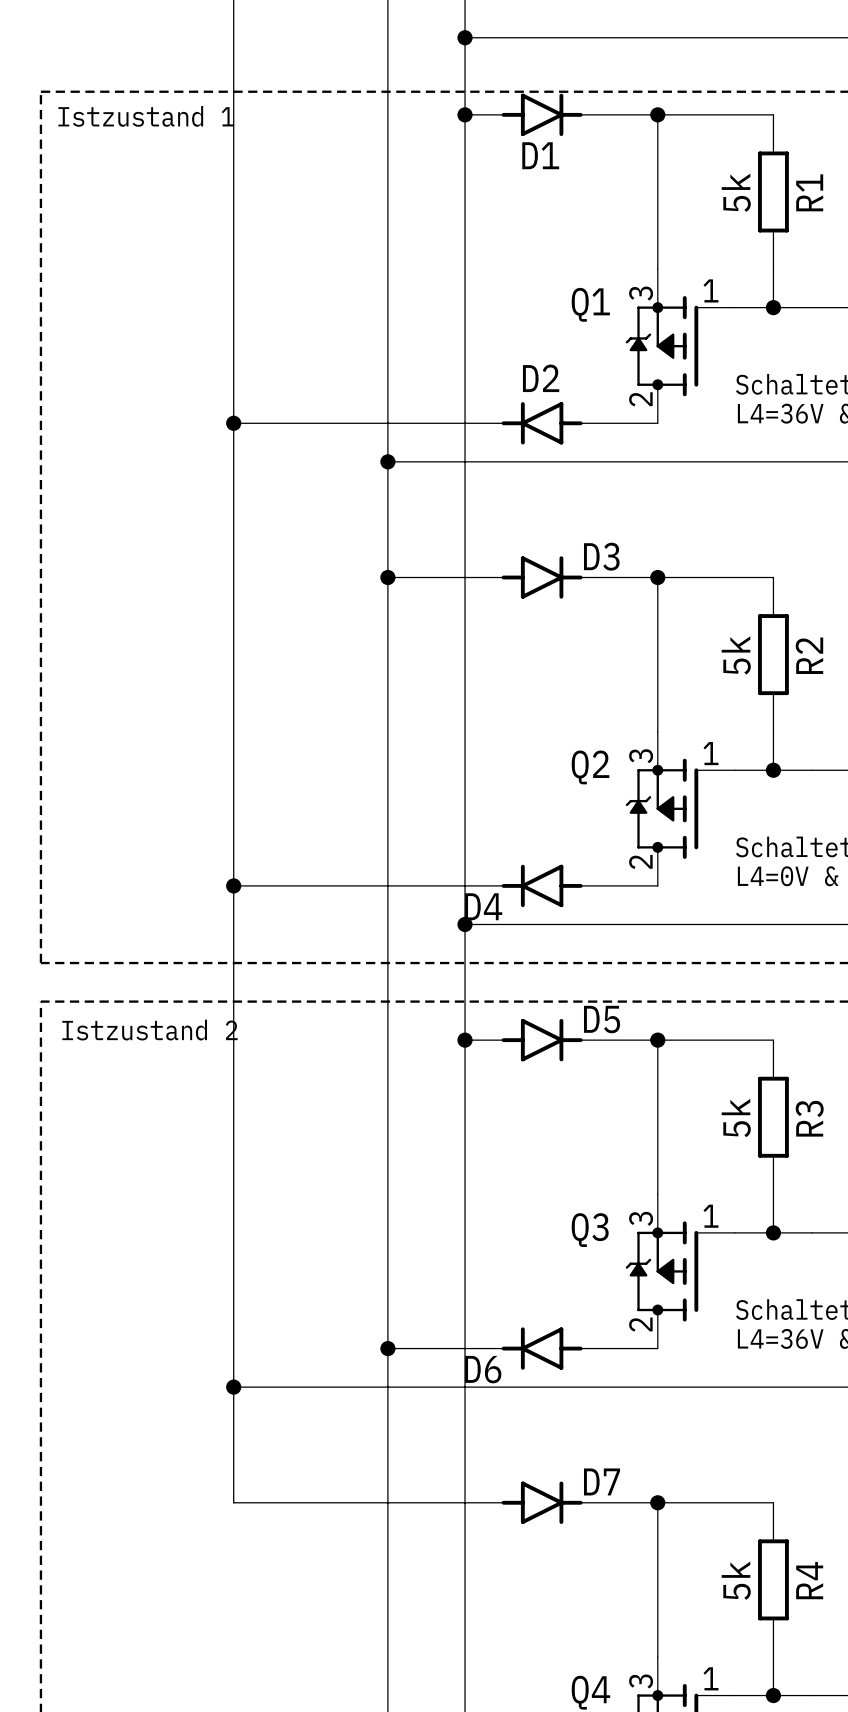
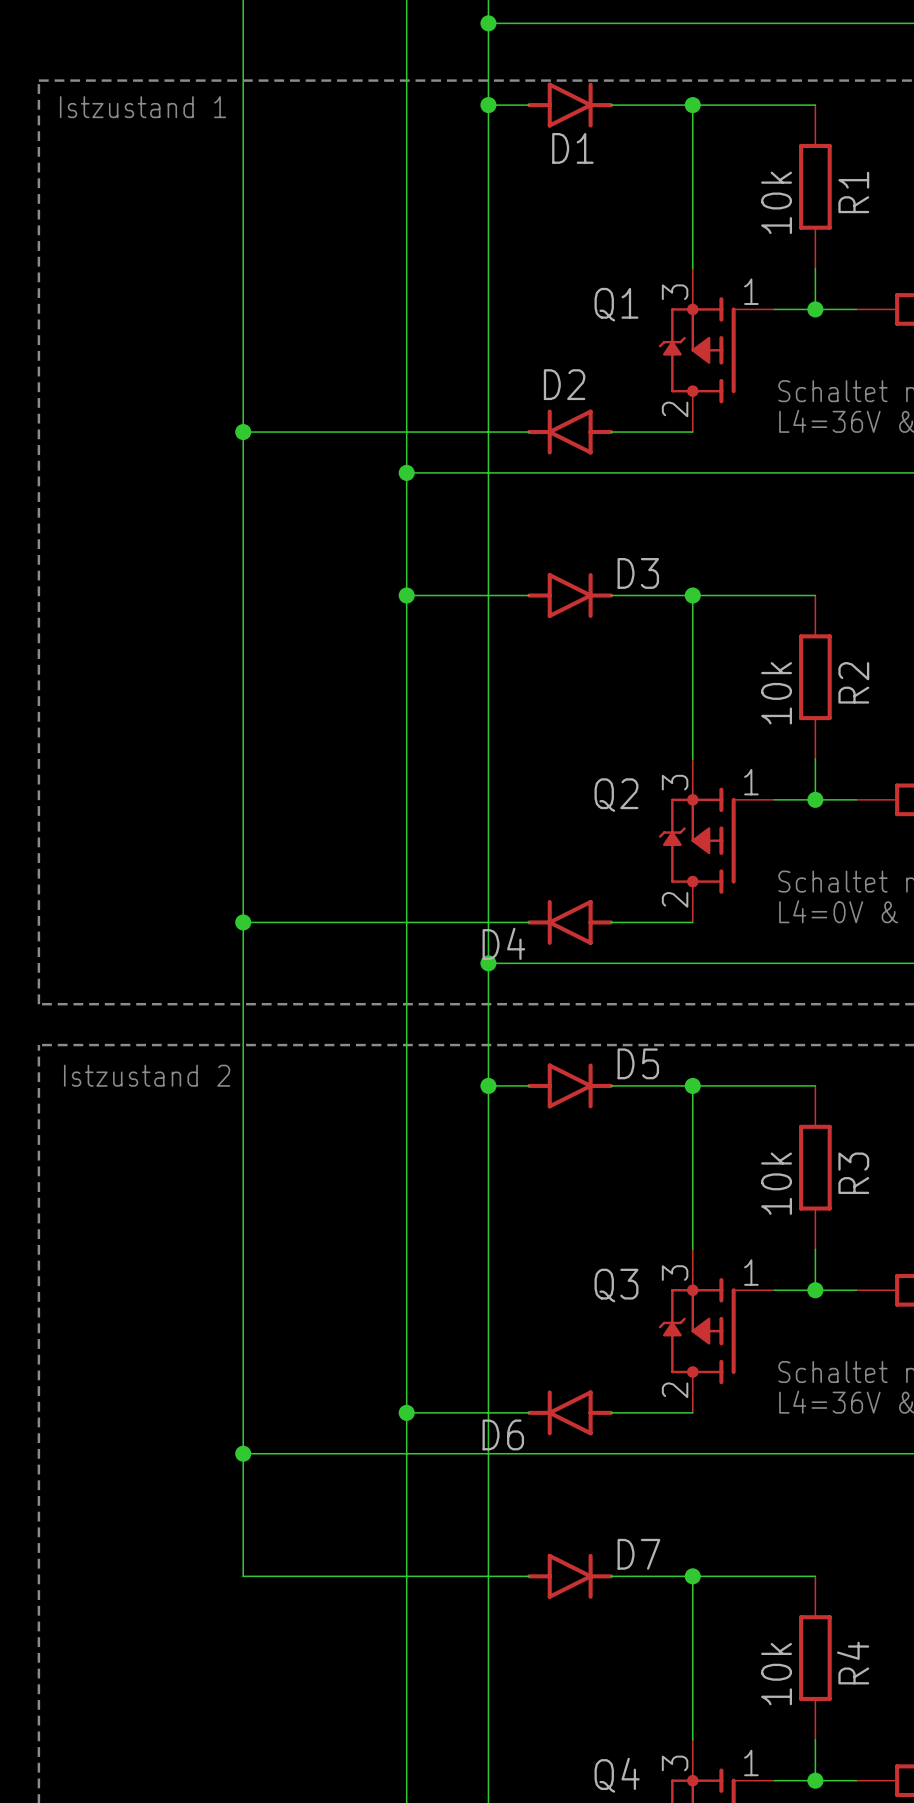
R1 value: 5k (736, 192) -> 10k (776, 202)
R2 value: 5k (736, 655) -> 10k (776, 693)
R3 value: 5k (736, 1118) -> 10k (776, 1183)
R4 value: 5k (736, 1580) -> 10k (776, 1674)

